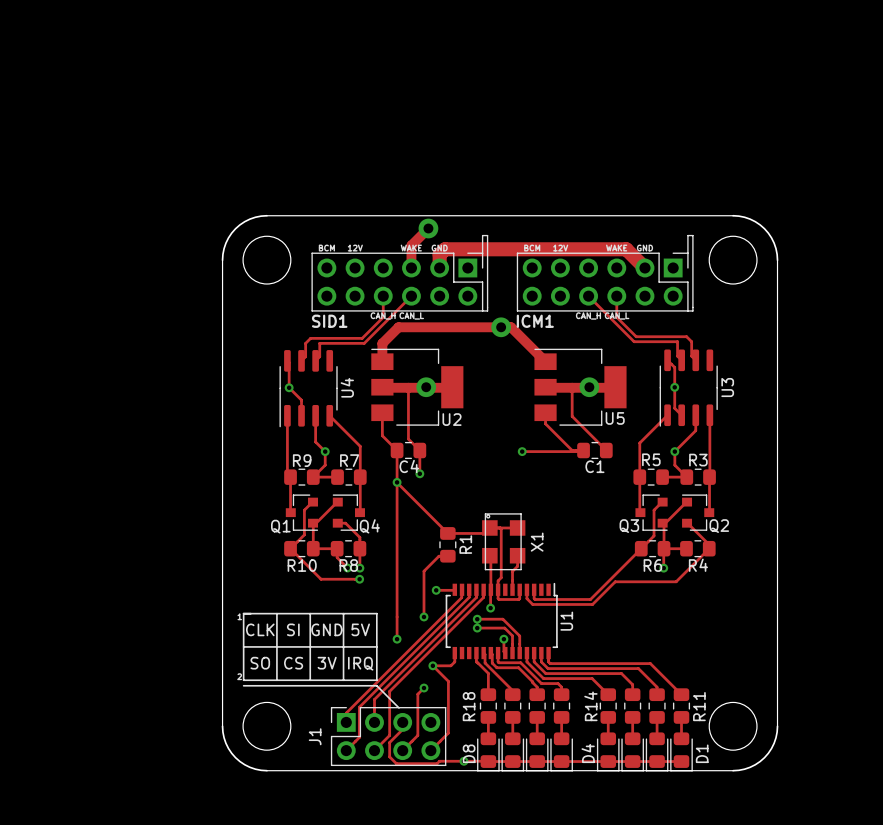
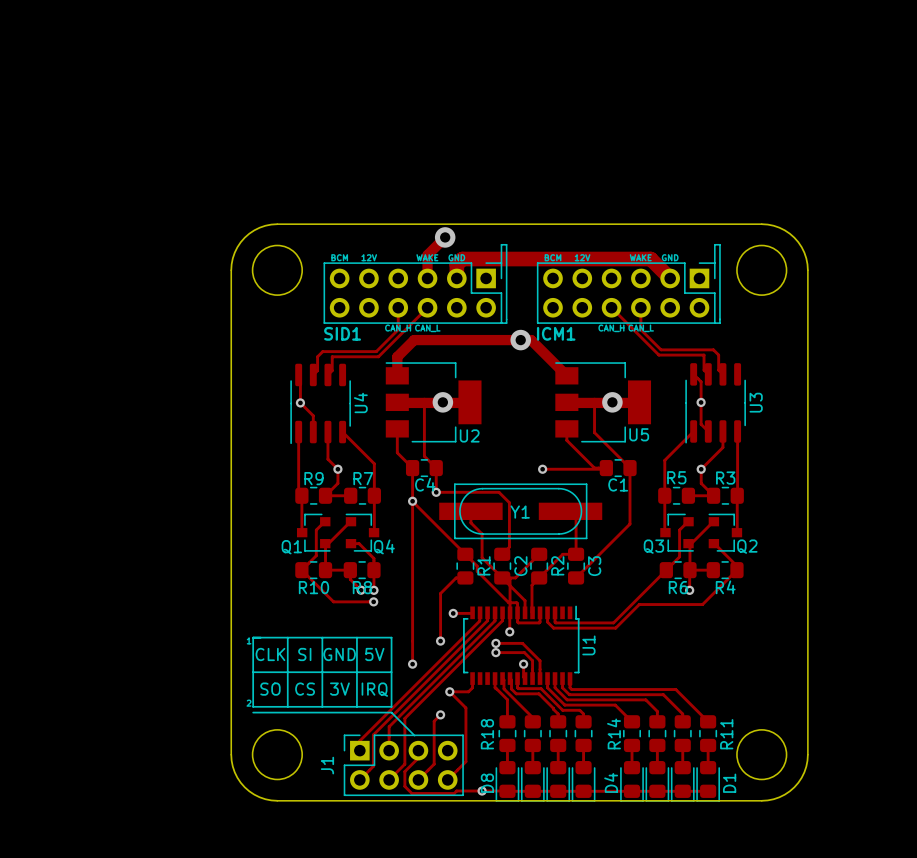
track: none -> (629, 468) (629, 524) (576, 577)
track: none -> (436, 492) (499, 492) (509, 502) (509, 547) (502, 554)
track: none -> (470, 511) (470, 522) (482, 534) (482, 557) (525, 600) (525, 612)
Y1: none -> (520, 511)
track: (500, 527) (501, 577) (498, 580) -> (465, 554) (477, 566) (477, 571) (508, 602) (517, 603)
track: (517, 527) (489, 527) (484, 533) (447, 533) -> none
track: none -> (539, 554) (515, 577) (502, 577)
X1: (503, 541) -> none
C2: none -> (502, 566)
R2: none -> (539, 566)
C3: none -> (576, 566)
track: (517, 555) (517, 566) (512, 571) (512, 589) -> (570, 511) (576, 516) (576, 554) (562, 554) (531, 585) (532, 612)

